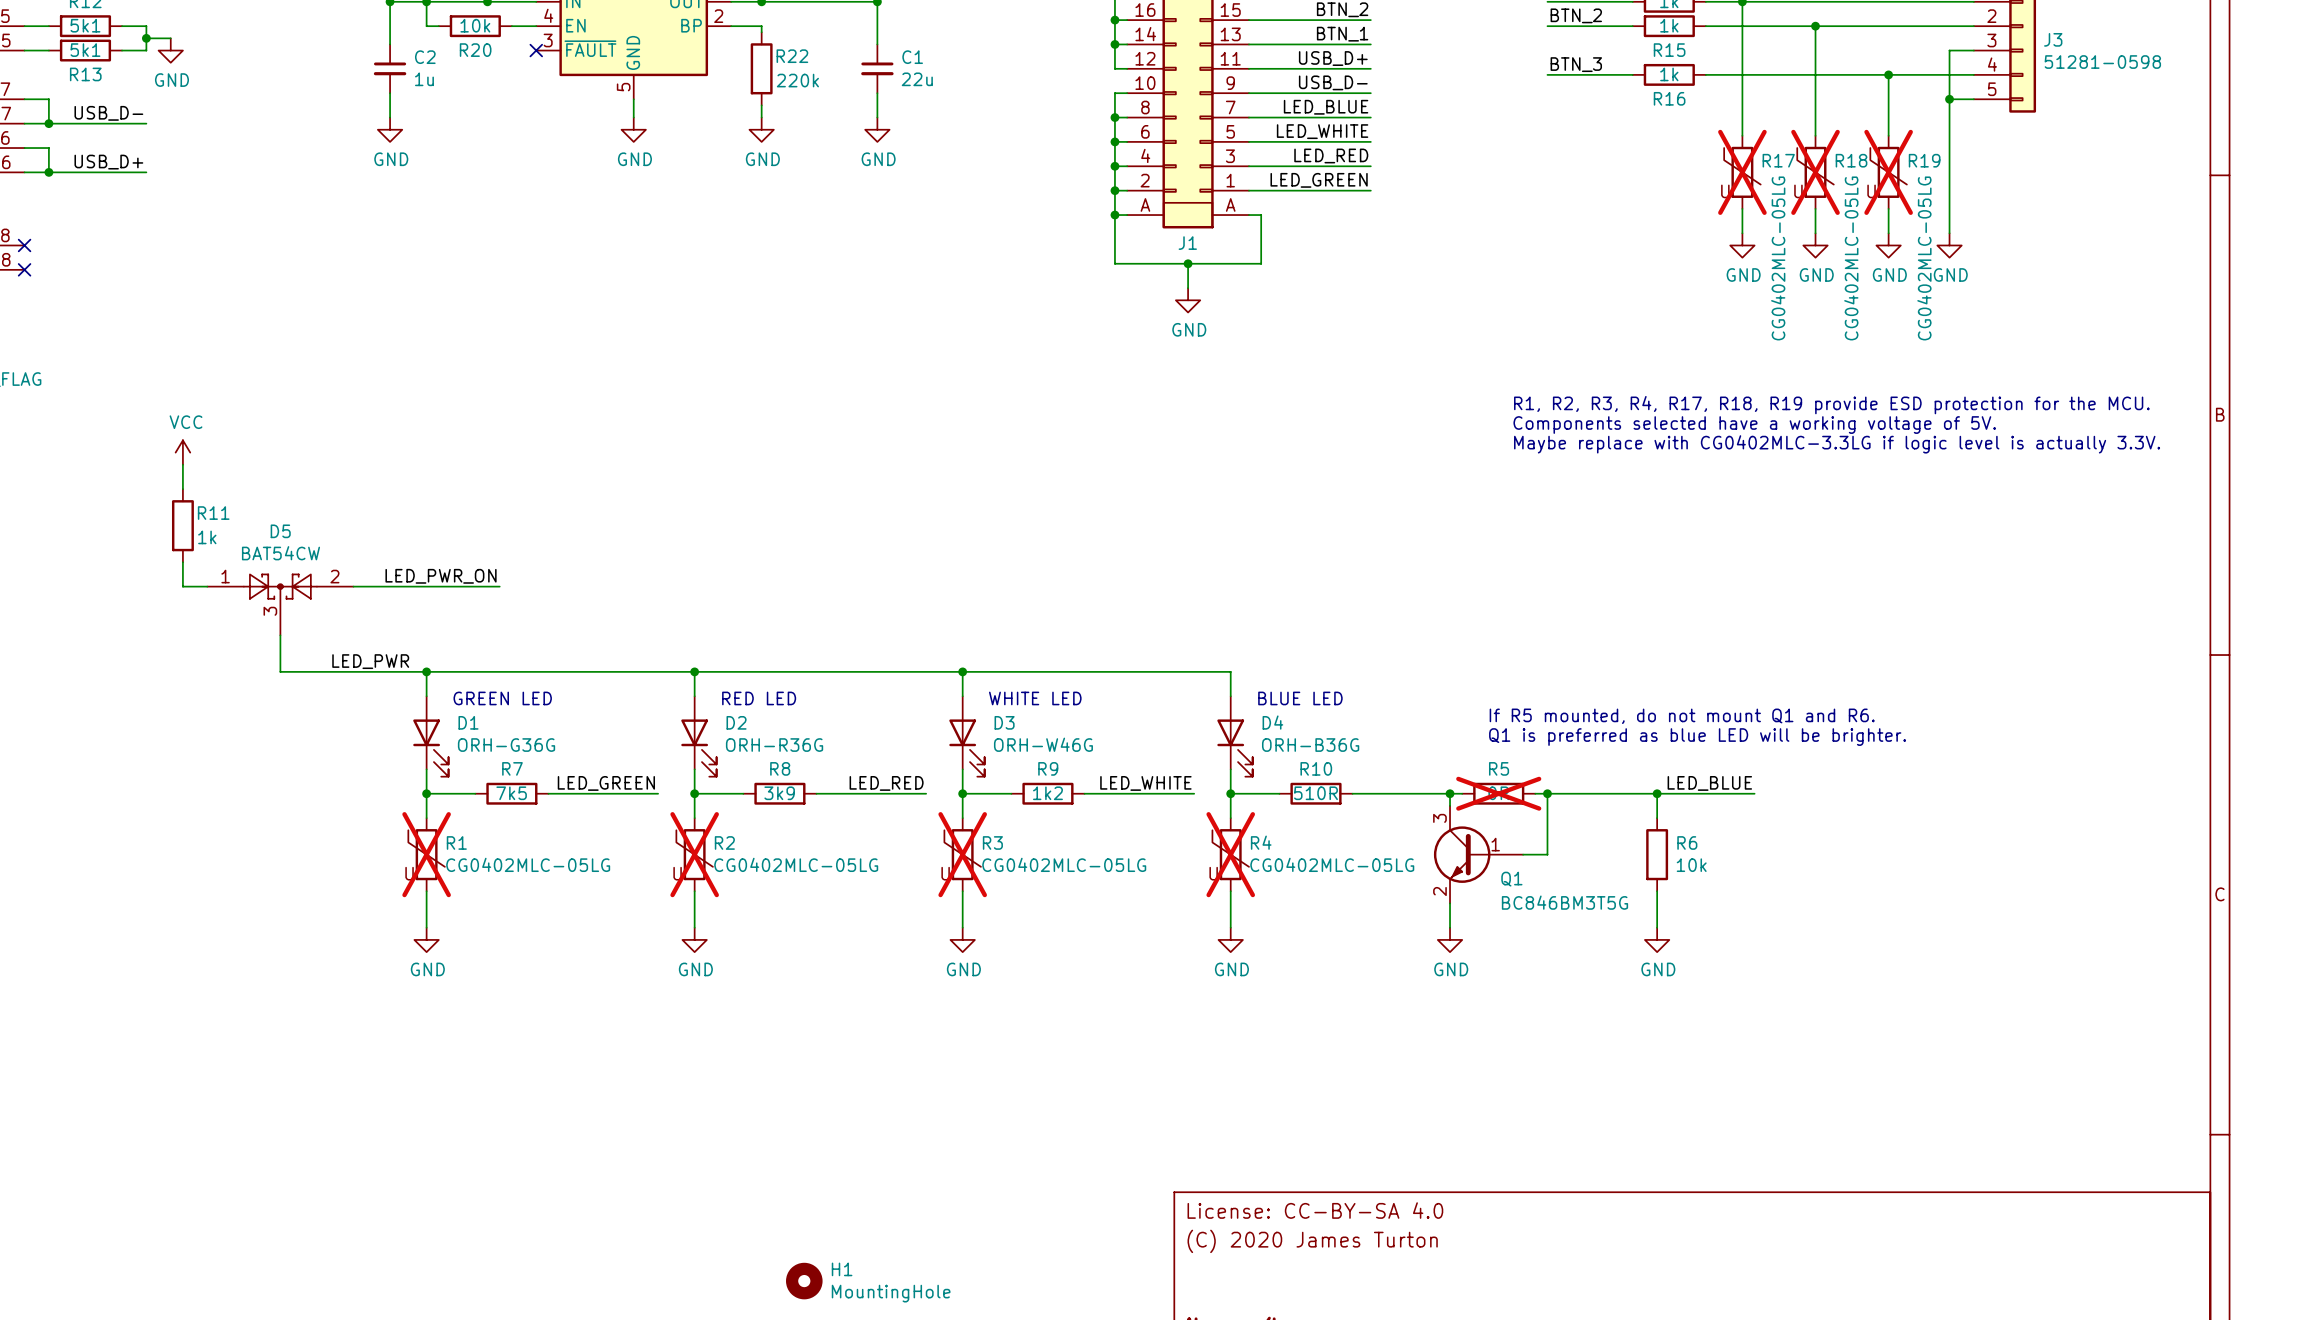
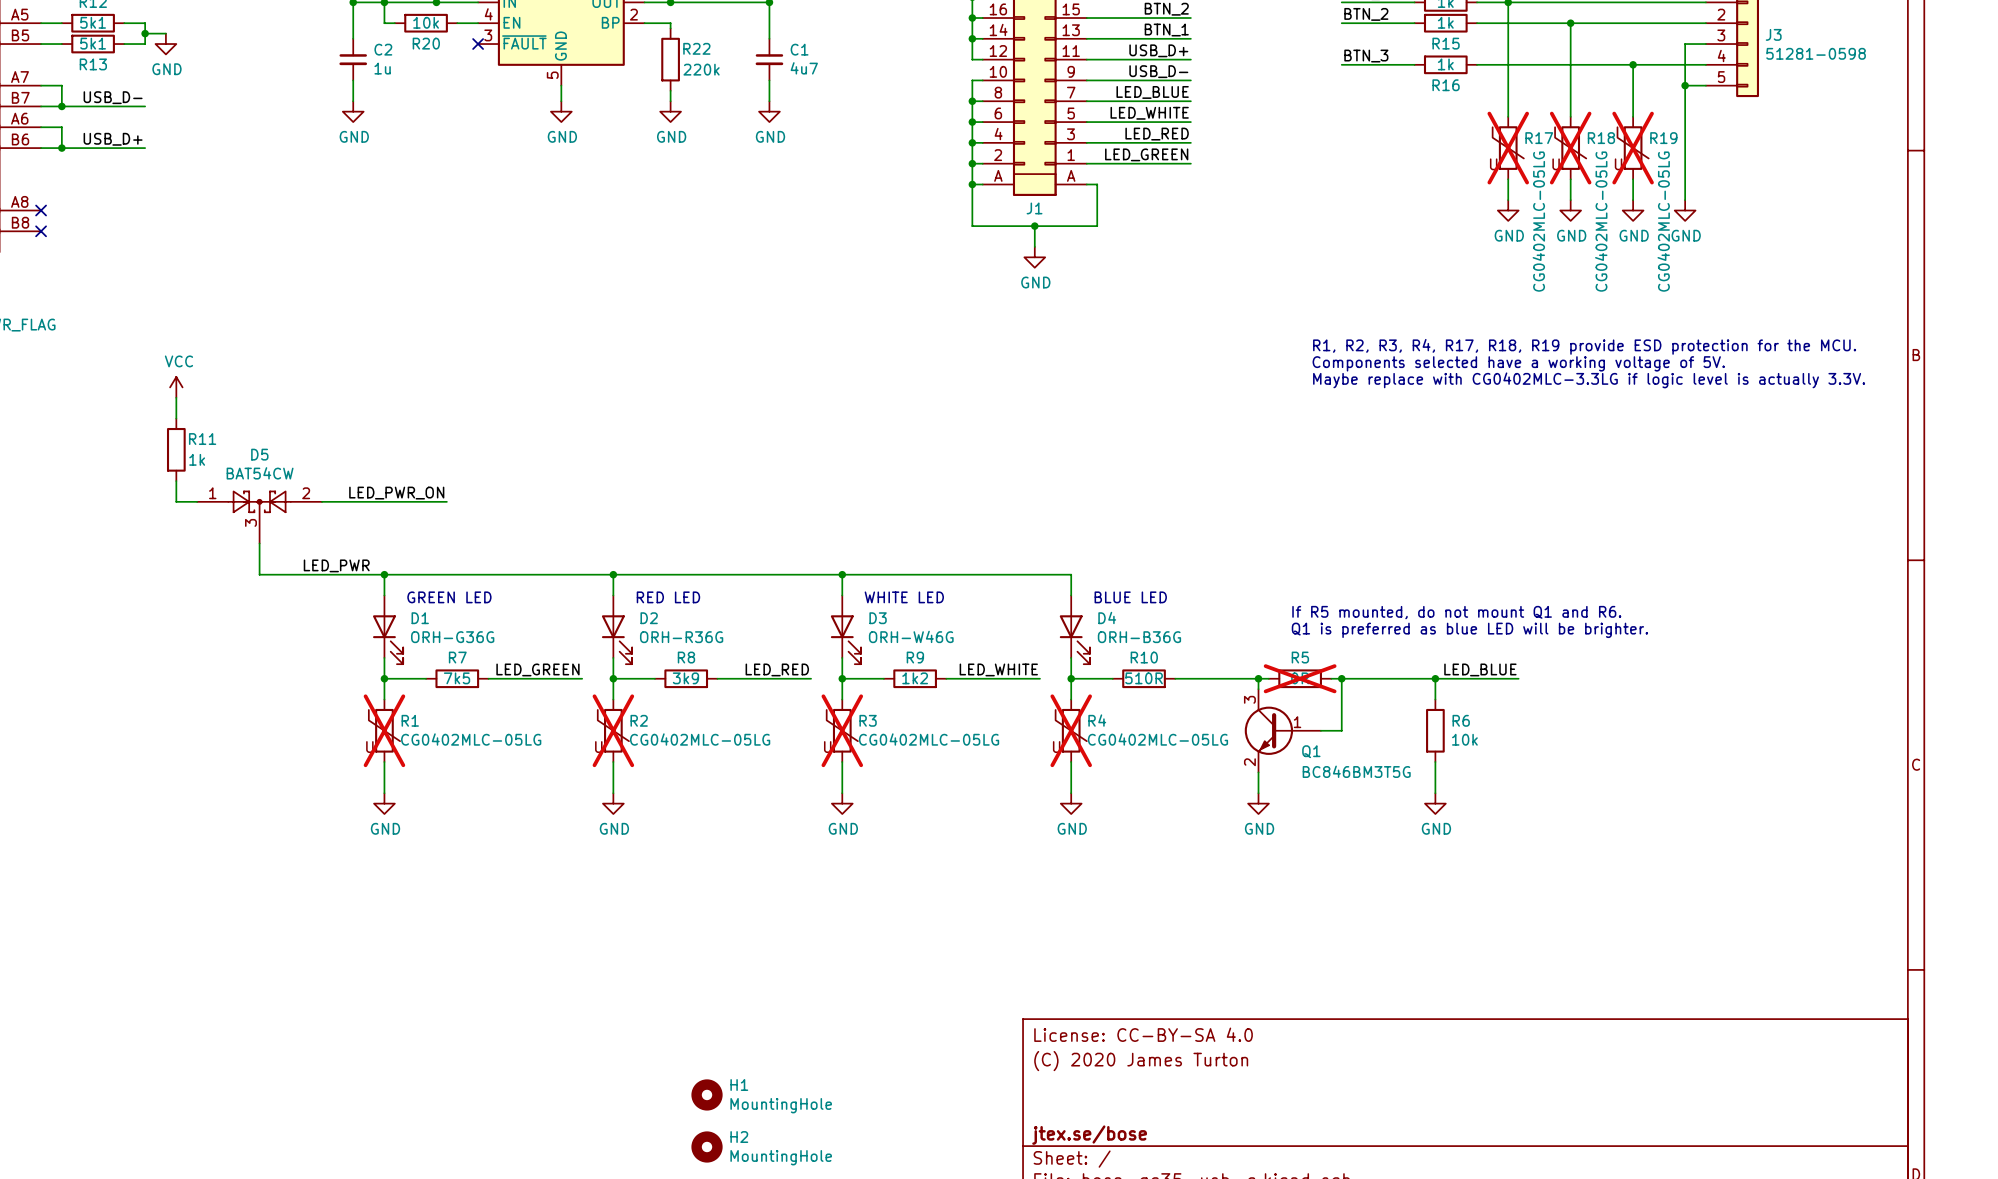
C1 value: 22u (917, 79) -> 4u7 (804, 68)

